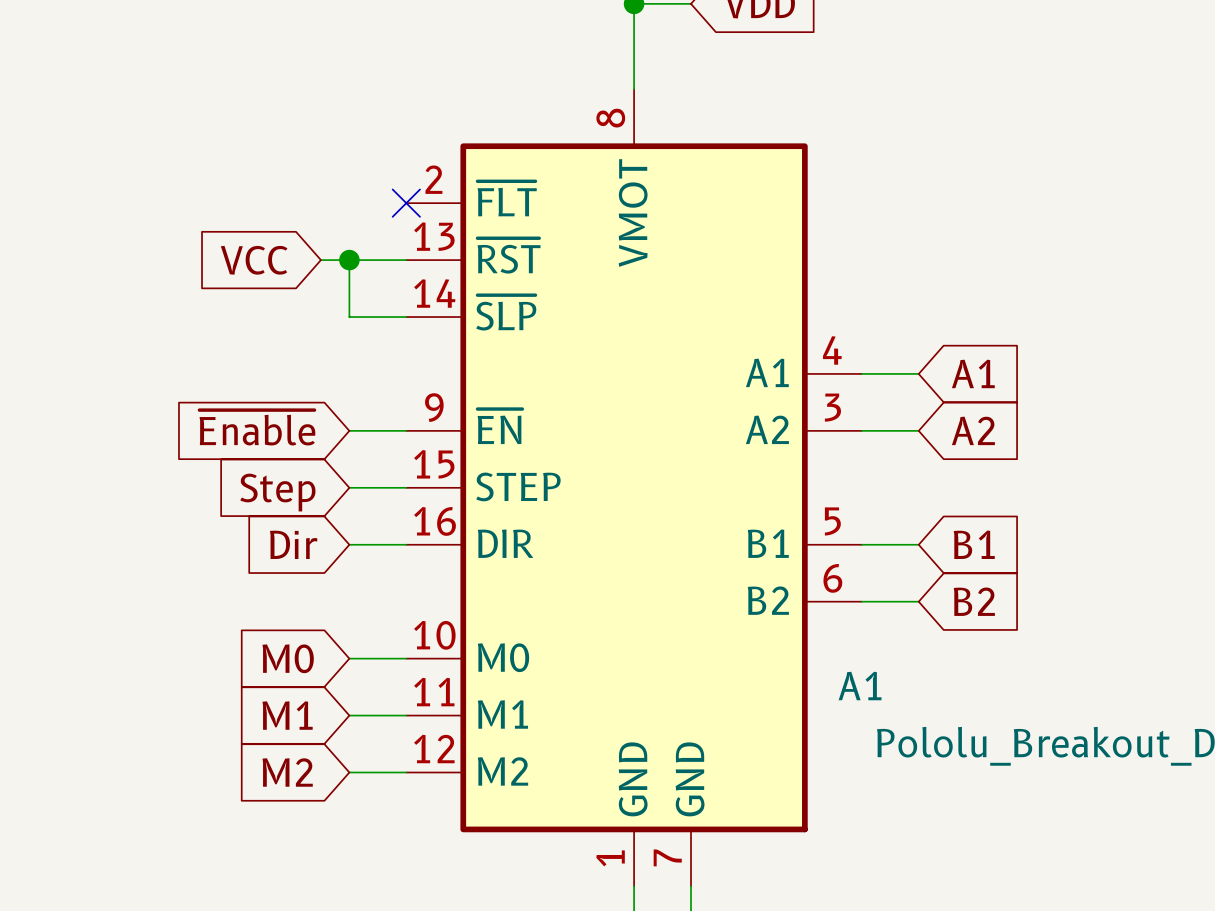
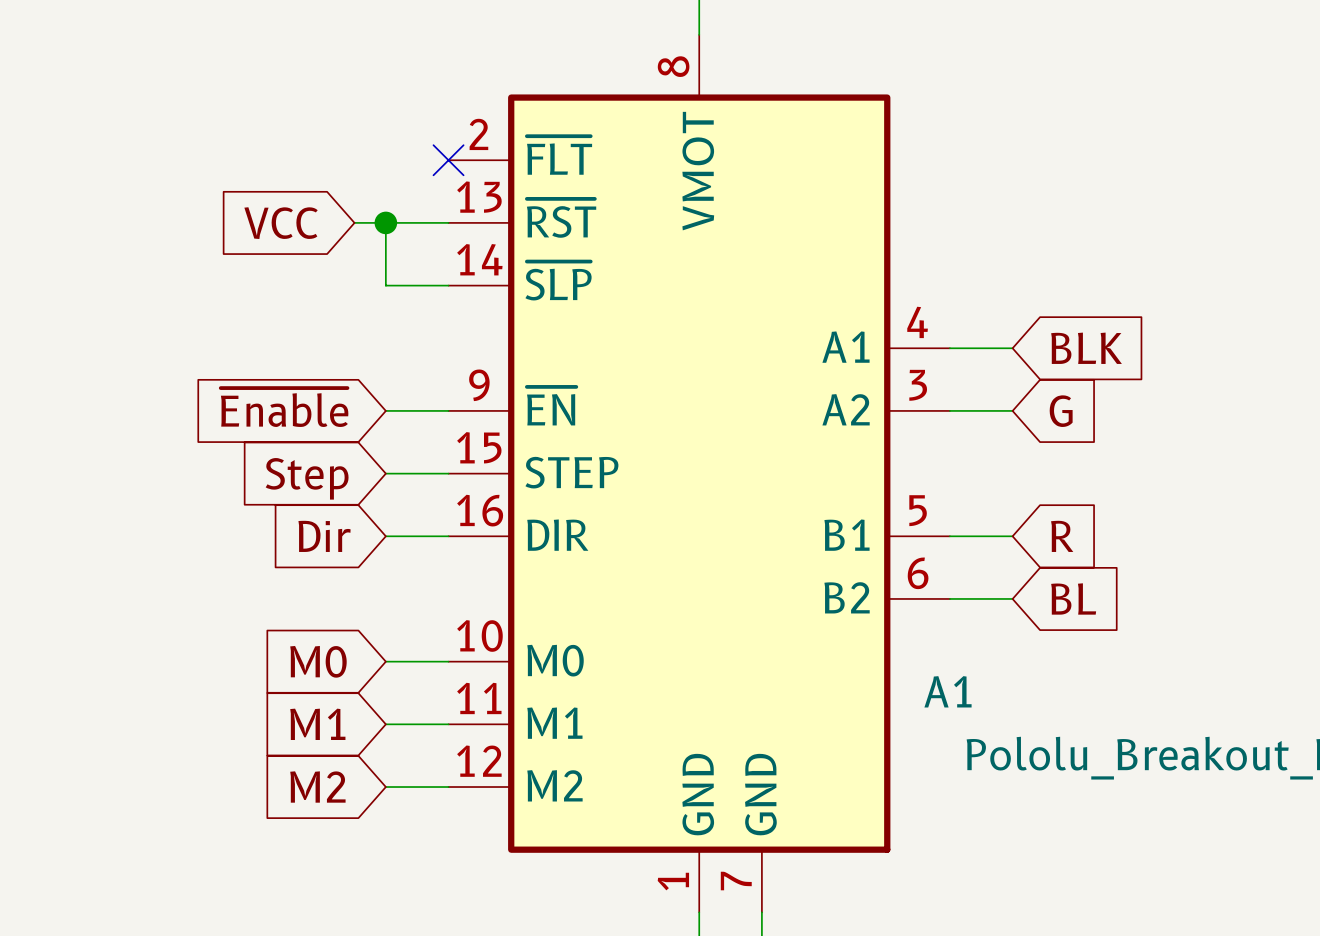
global label: A1 (973, 373) -> BLK (1086, 348)
global label: A2 (973, 430) -> G (1061, 411)
global label: B1 (974, 544) -> R (1062, 536)
global label: B2 (974, 601) -> BL (1073, 598)

